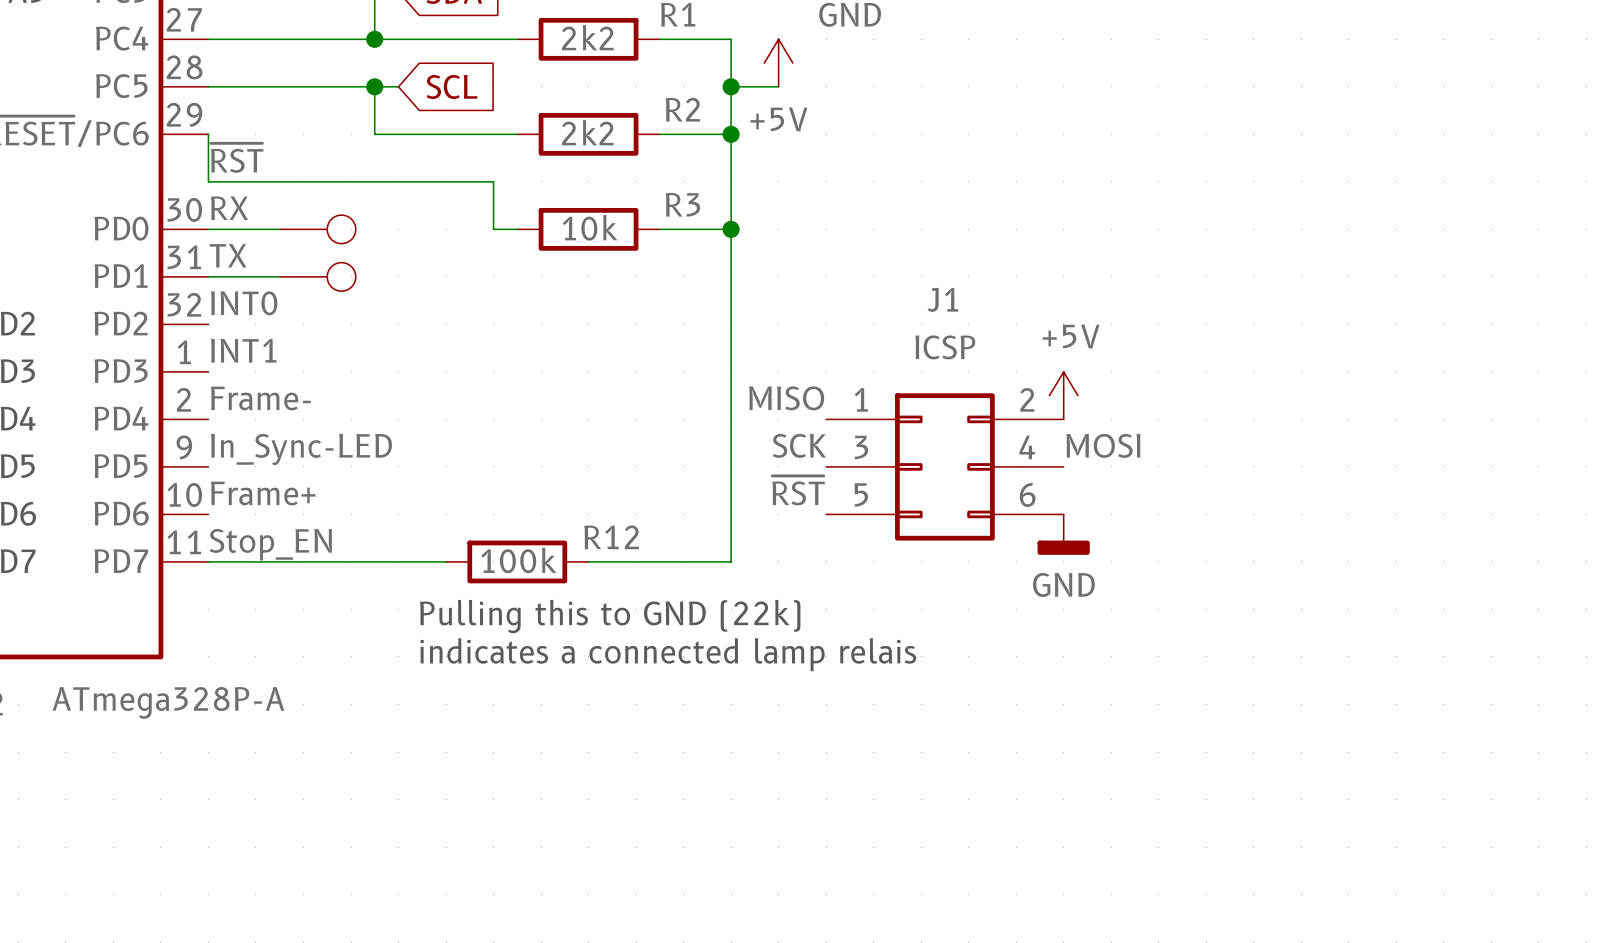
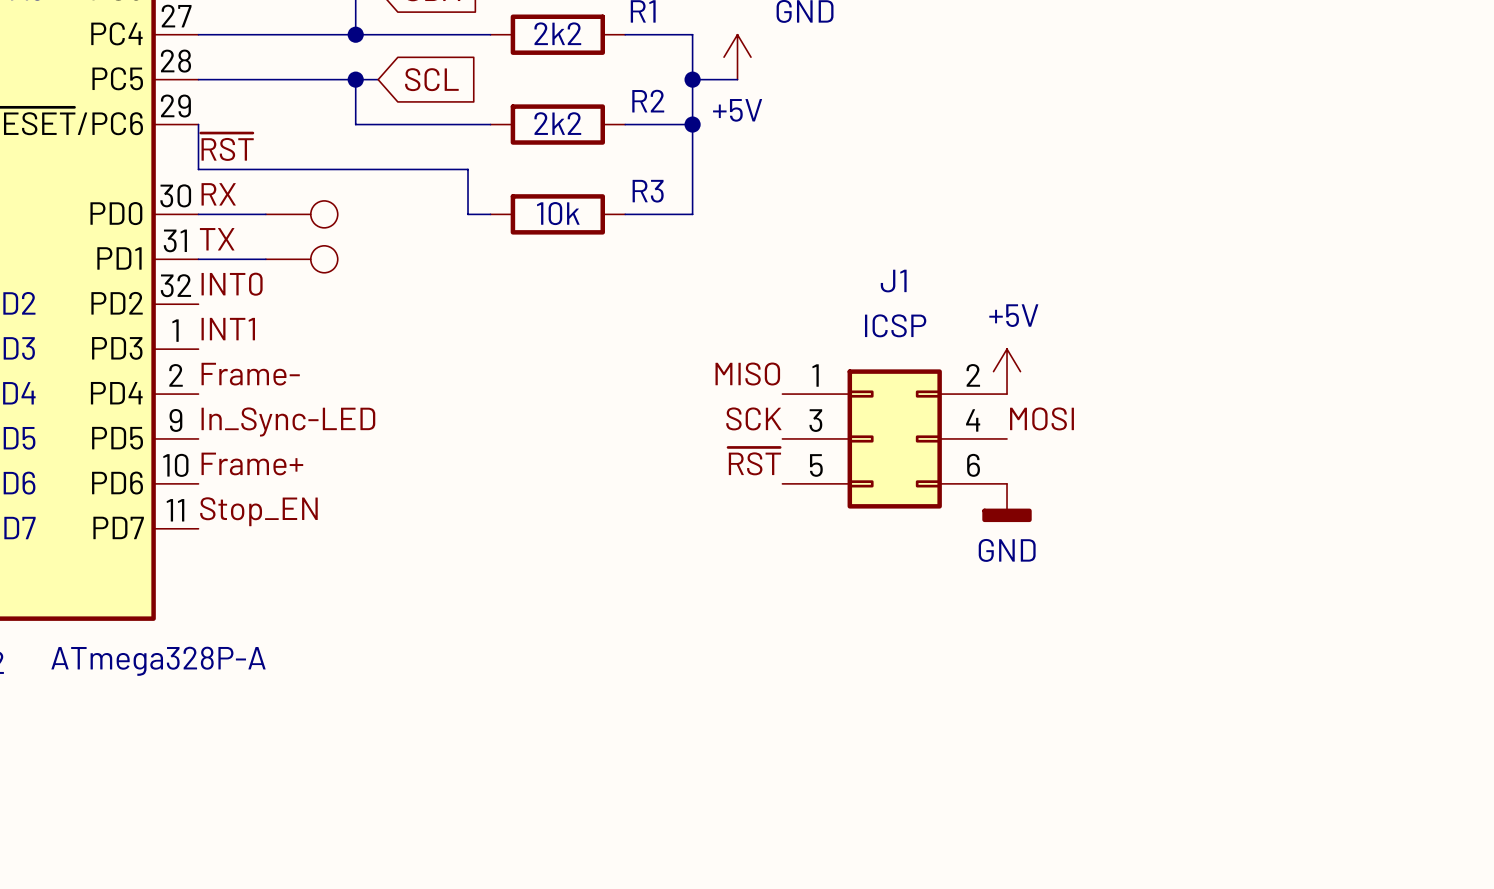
wire: (731, 229) (731, 561) (588, 561) -> none
junction: (731, 229) -> none
wire: (208, 561) (446, 561) -> none
R12: 100k (517, 561) -> none
text: Pulling this to GND (22k) (610, 616) -> none
text: indicates a connected lamp relais (668, 654) -> none

